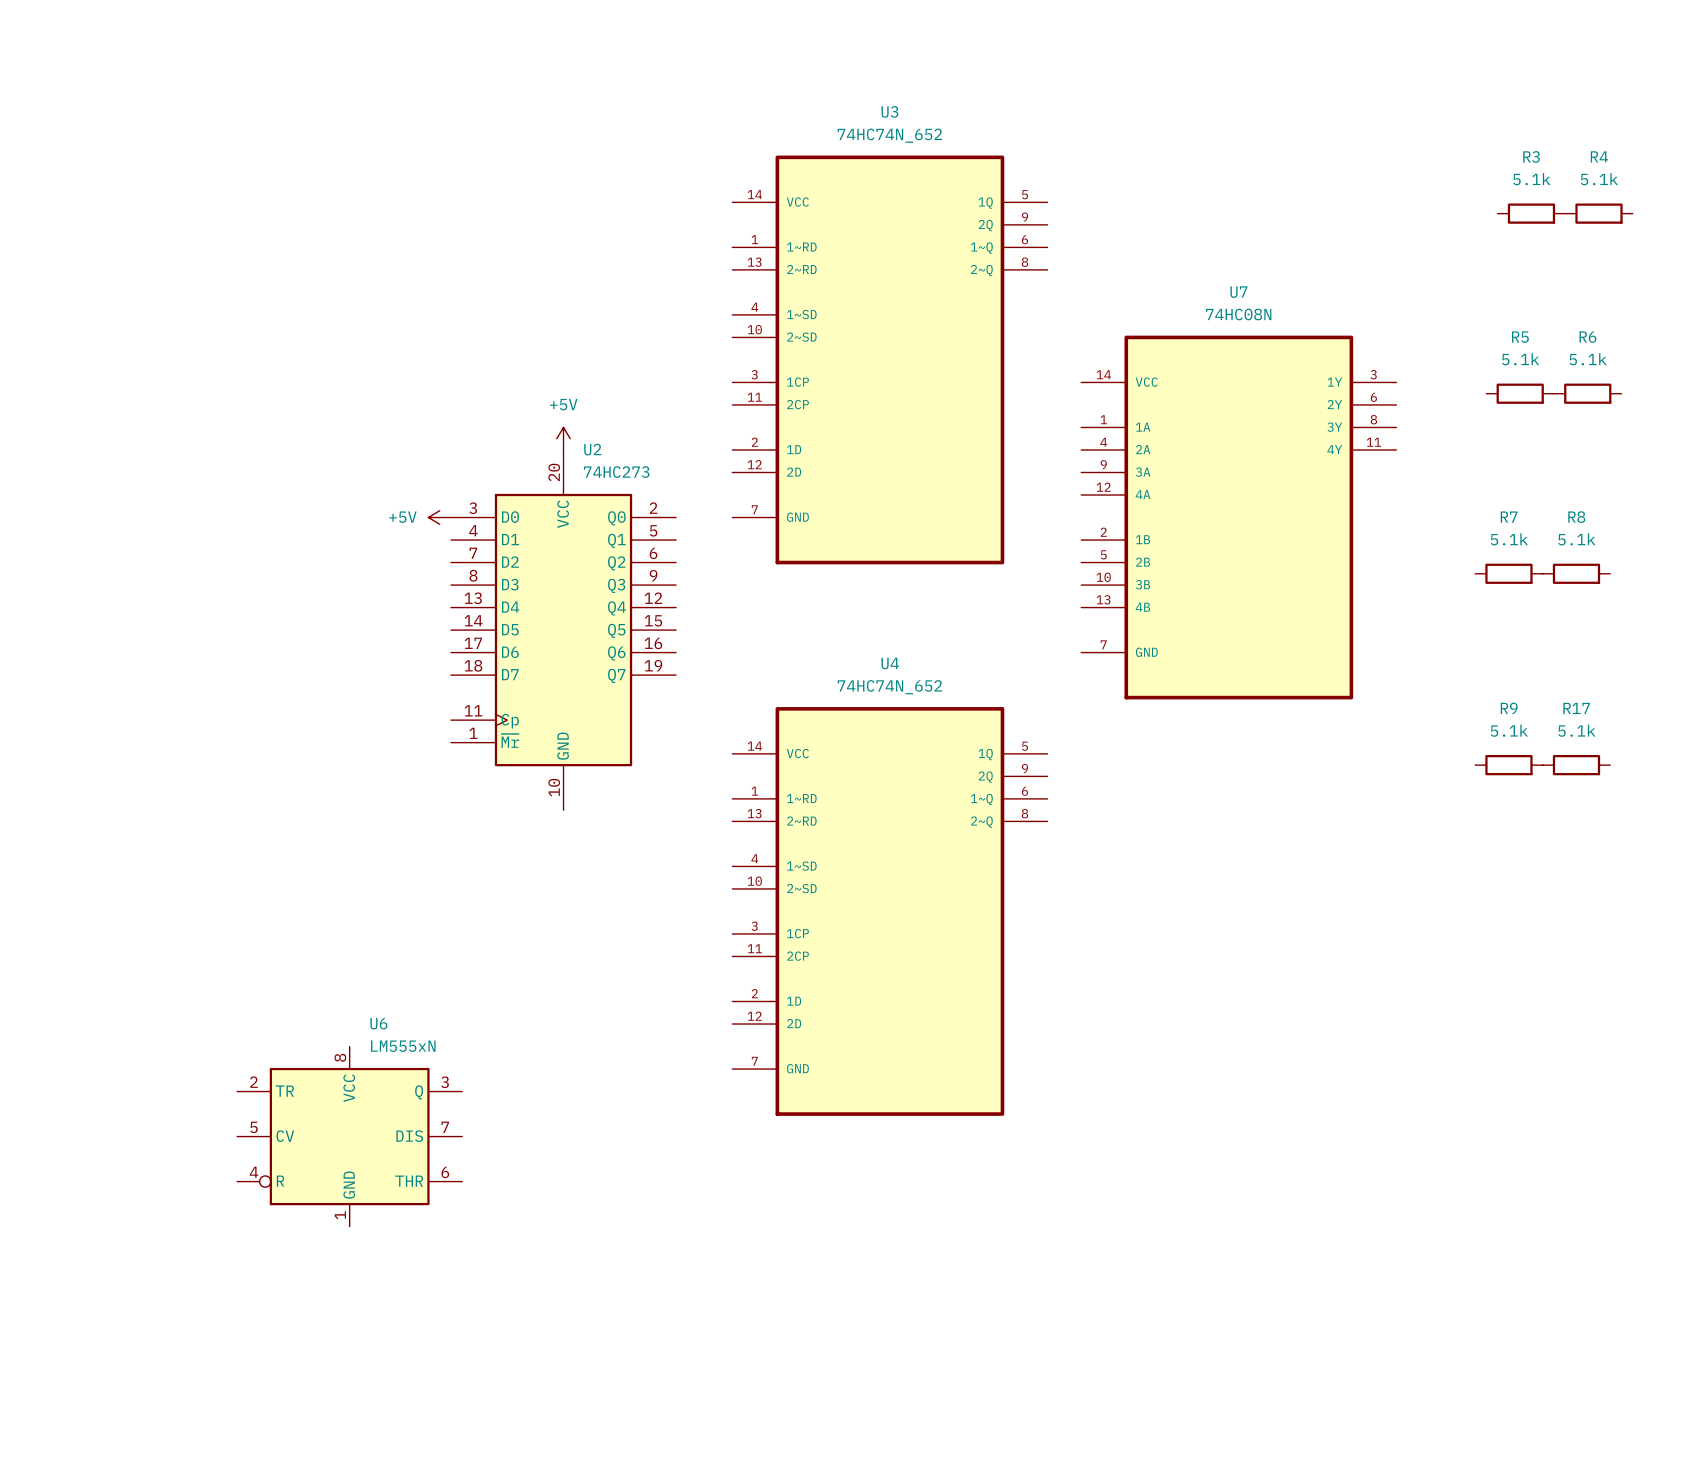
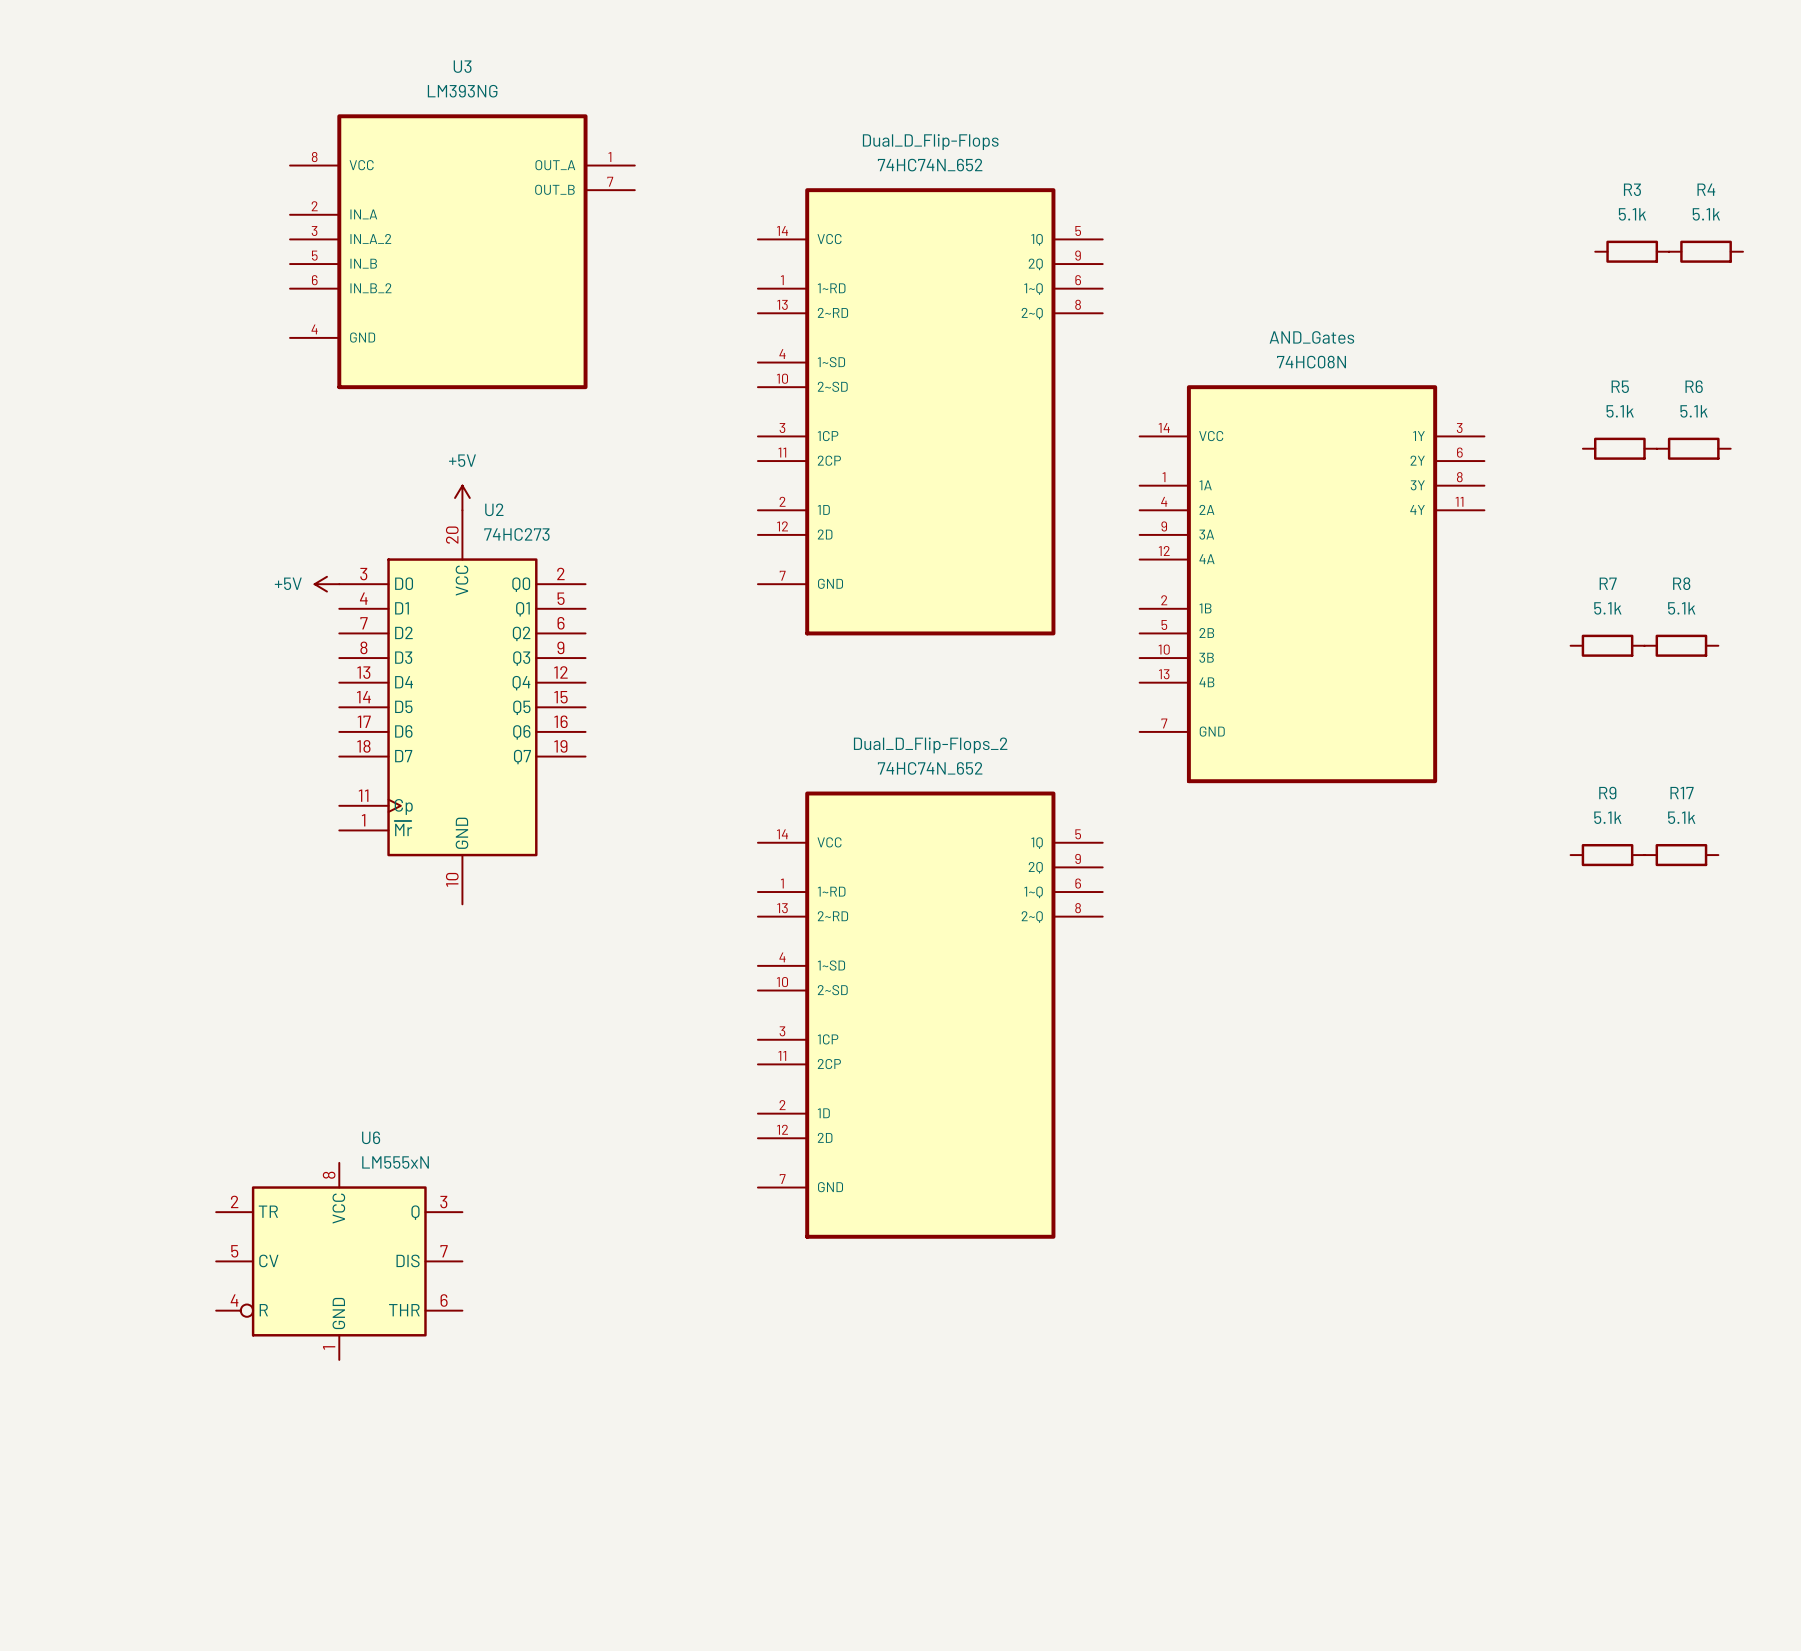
U3 name: U3 (889, 111) -> Dual_D_Flip-Flops (930, 142)
U3: none -> LM393NG (462, 251)
U7 name: U7 (1238, 292) -> AND_Gates (1311, 337)
power symbol: none -> +5V (462, 497)
power symbol: +5V (563, 438) -> none
power symbol: none -> +5V (326, 584)
power symbol: +5V (439, 517) -> none
U2 position: (563, 630) -> (462, 707)
U4 name: U4 (890, 663) -> Dual_D_Flip-Flops_2 (930, 745)

